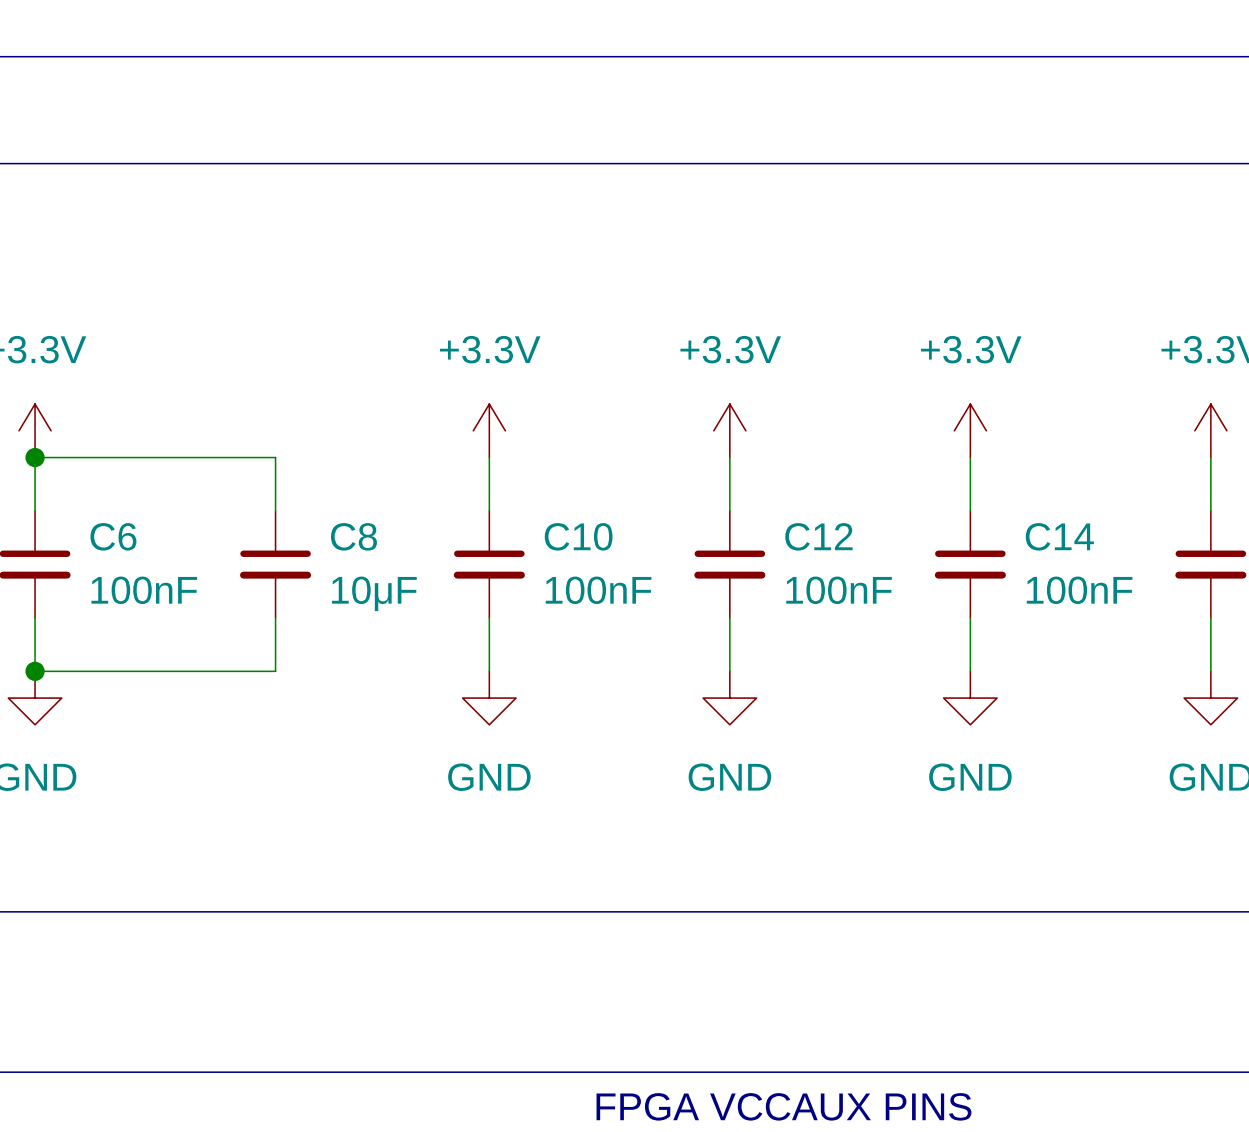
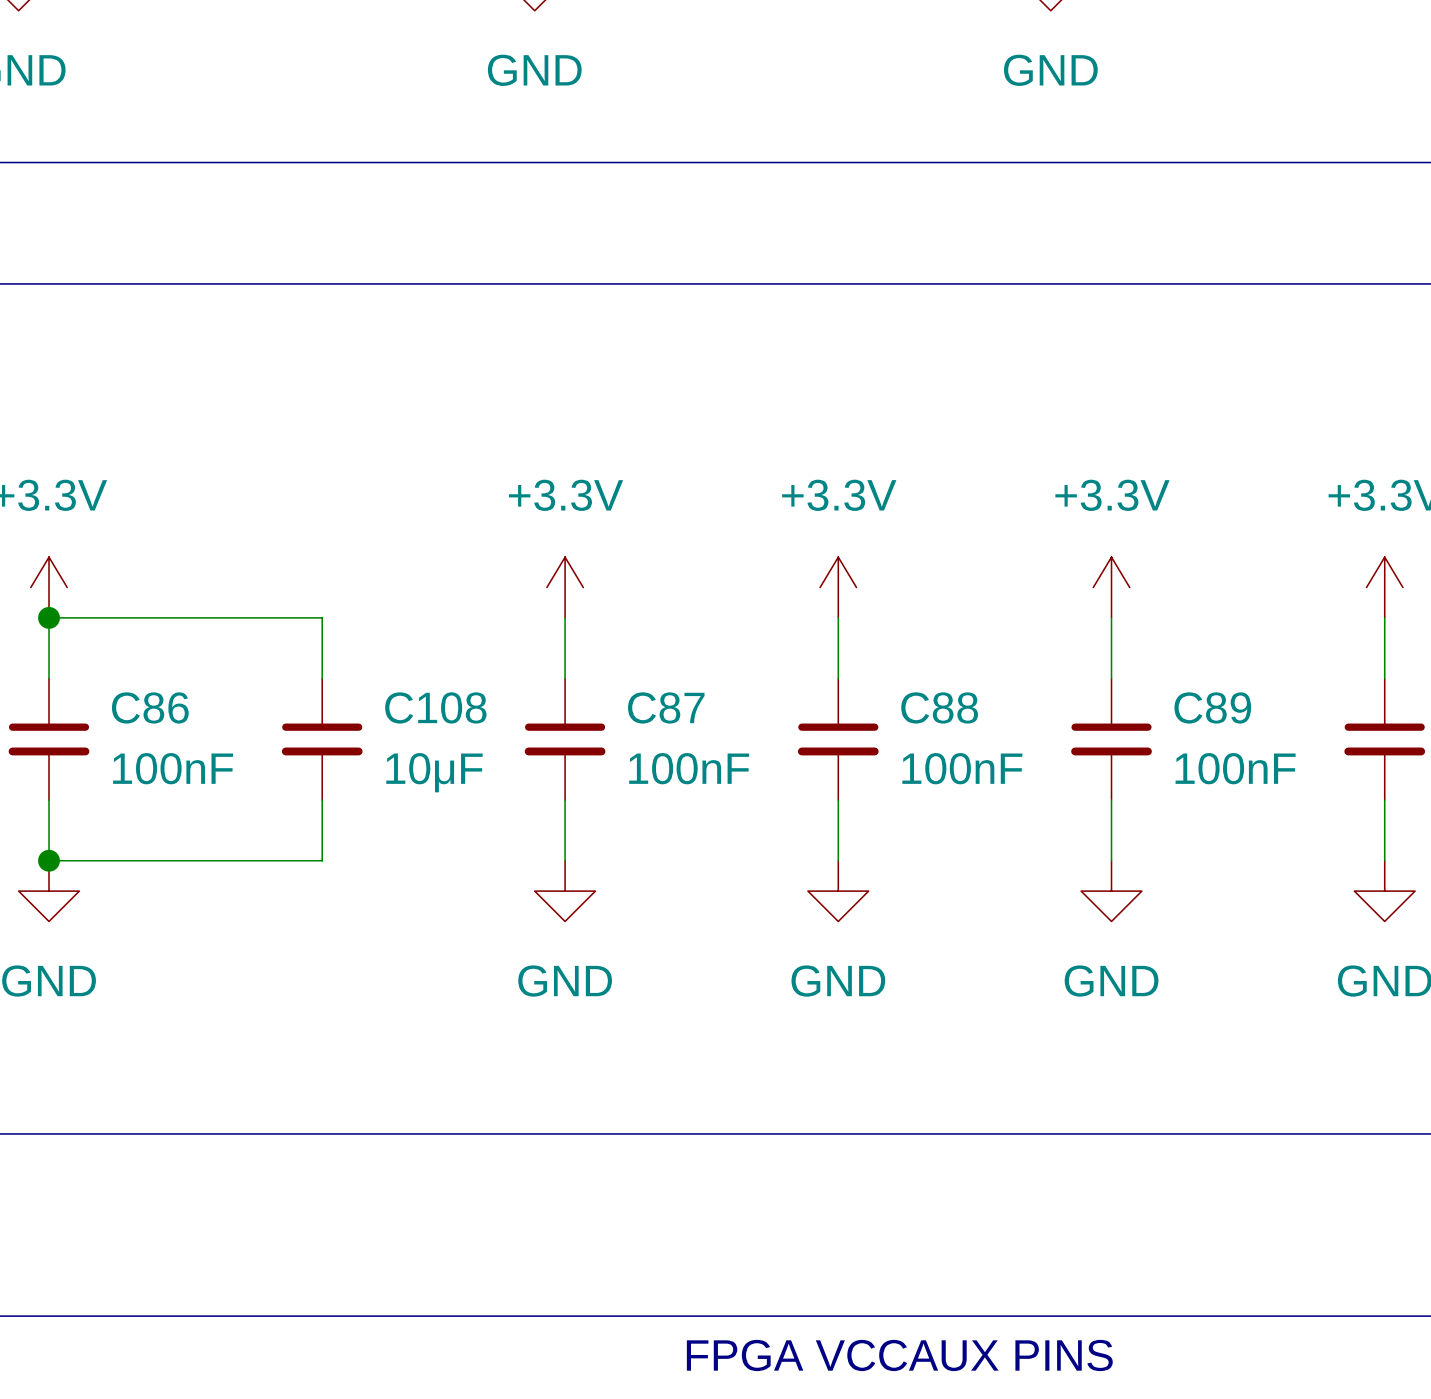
C6 name: C6 (113, 536) -> C86 (150, 707)
C8 name: C8 (353, 536) -> C108 (435, 707)
C10 name: C10 (578, 536) -> C87 (666, 707)
C12 name: C12 (818, 536) -> C88 (939, 707)
C14 name: C14 (1059, 536) -> C89 (1212, 707)

